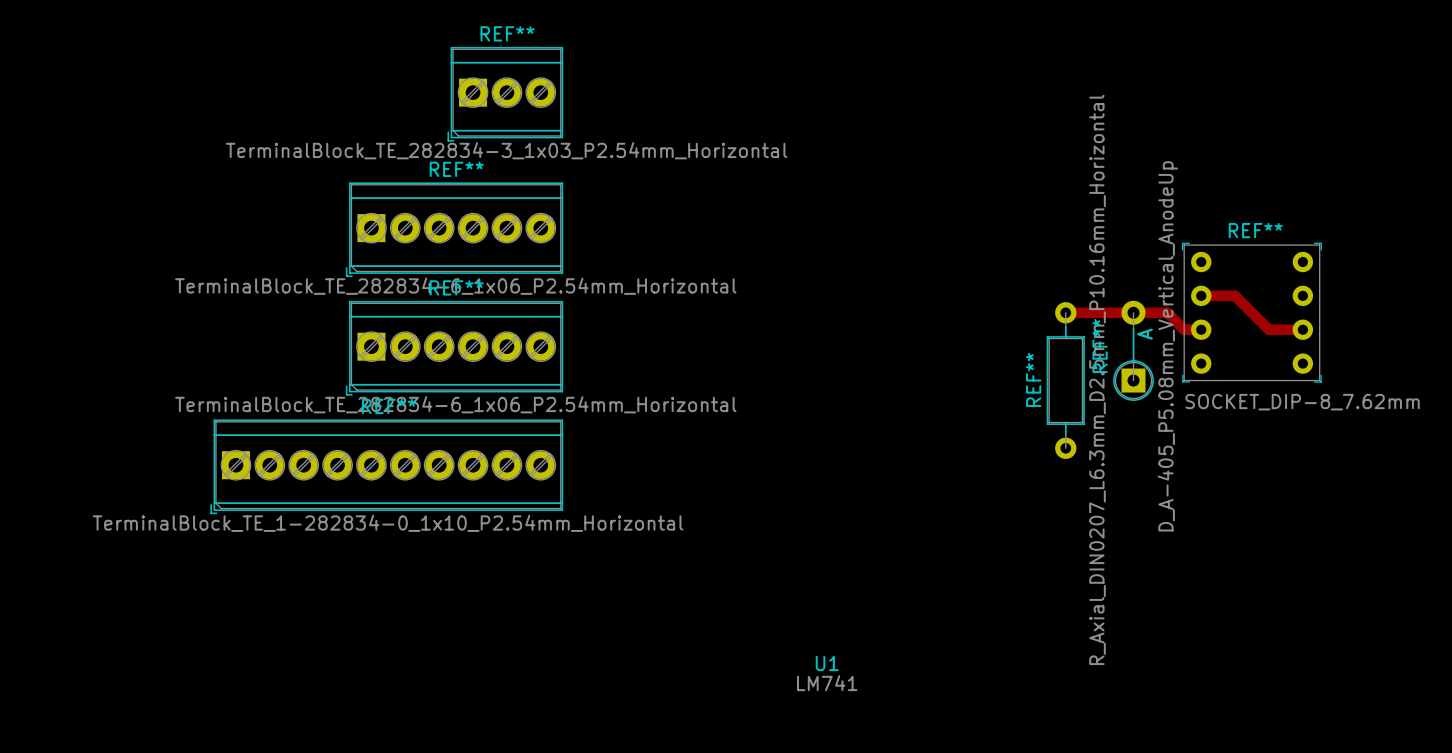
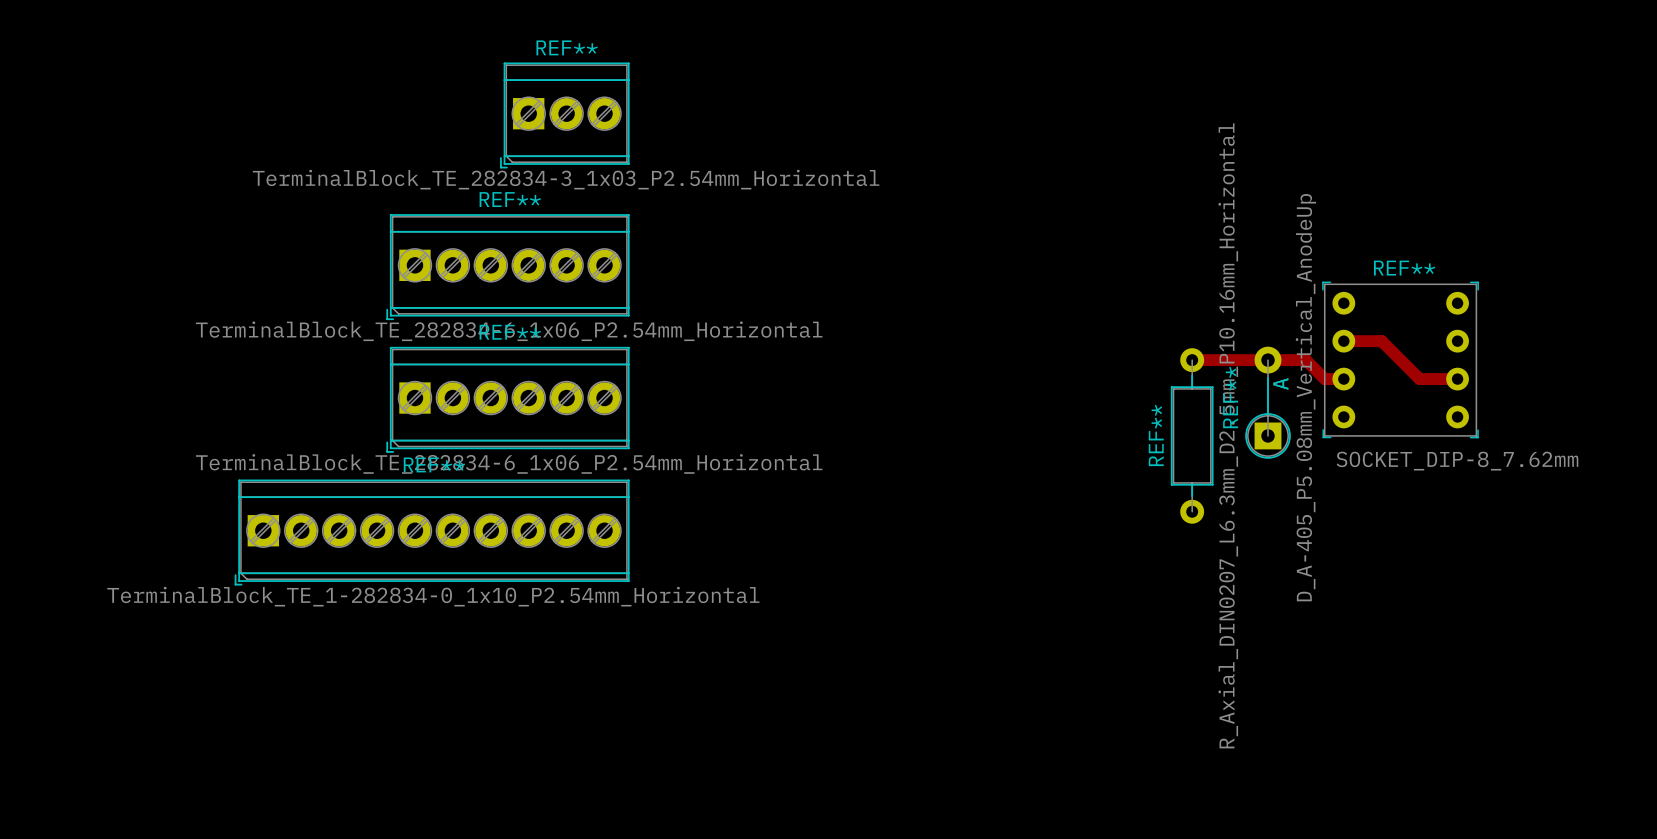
U1: LM741 (827, 673) -> none

